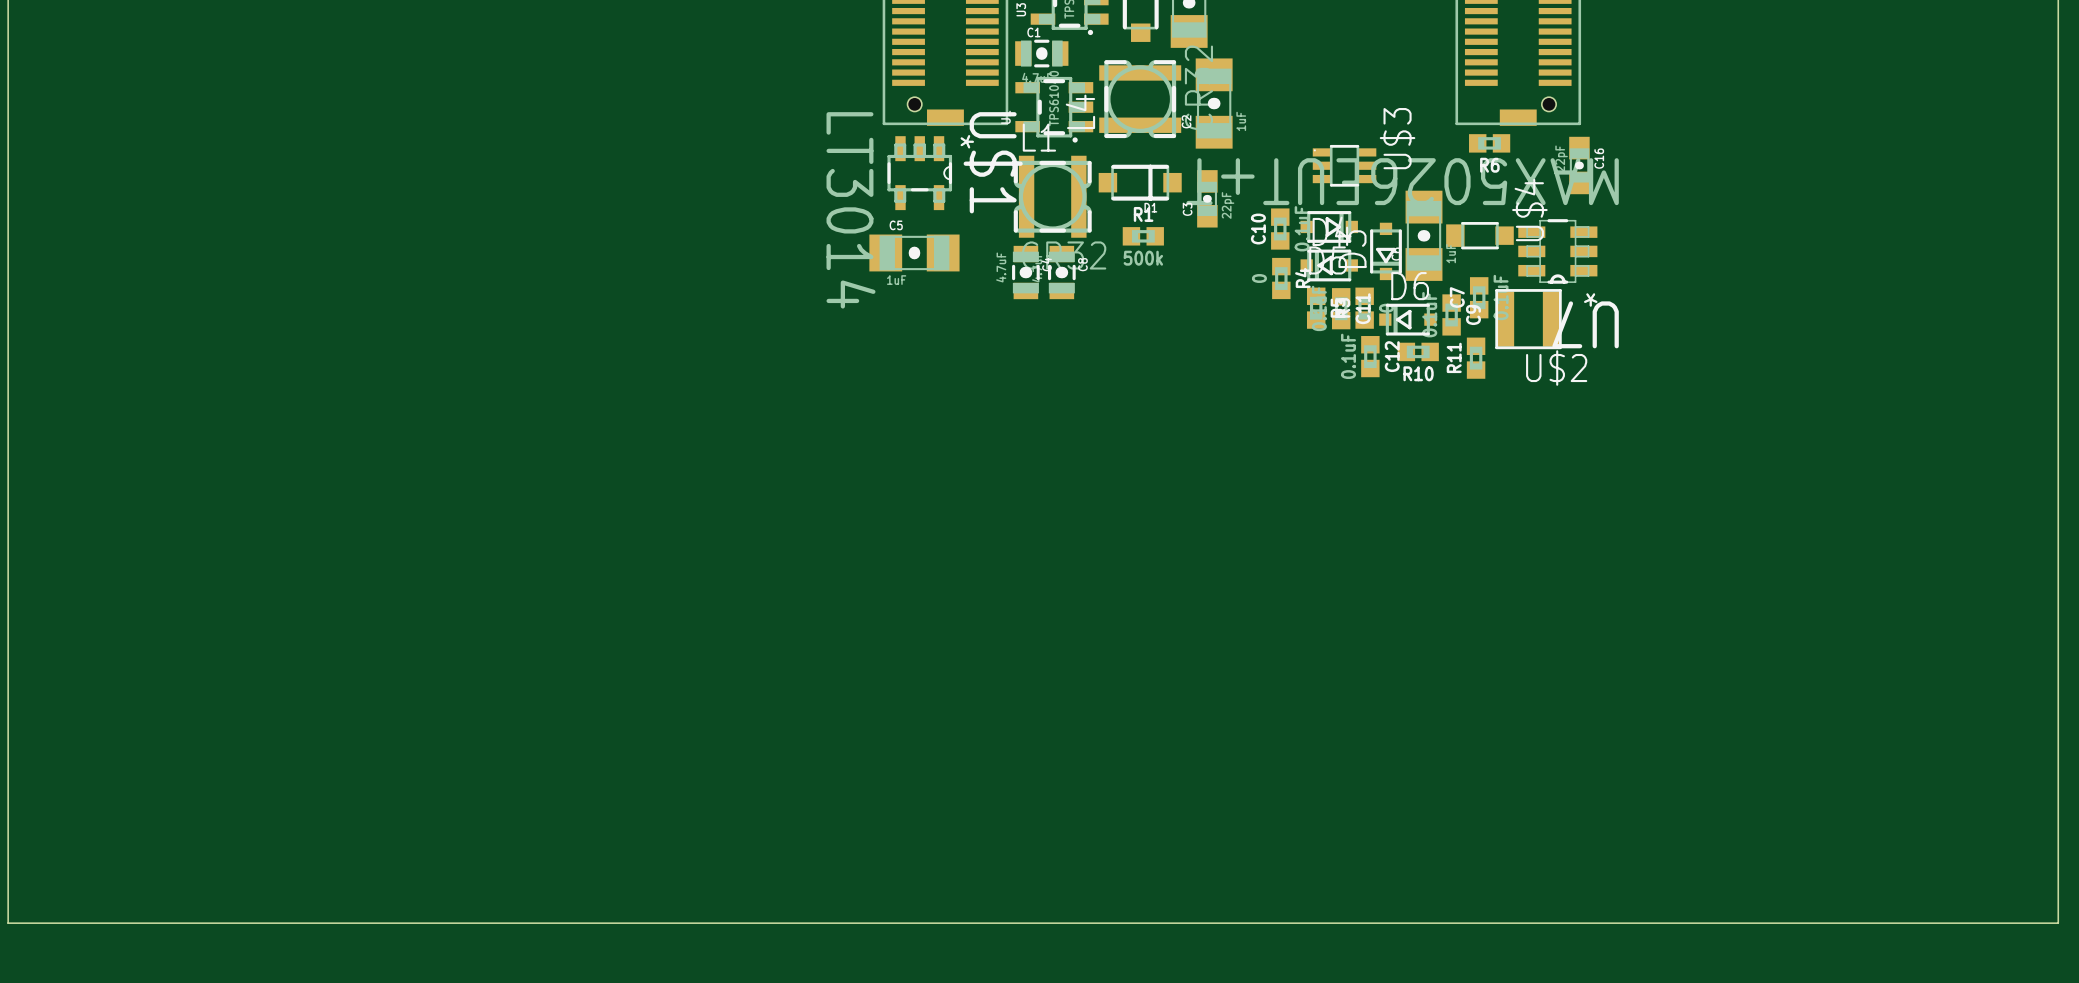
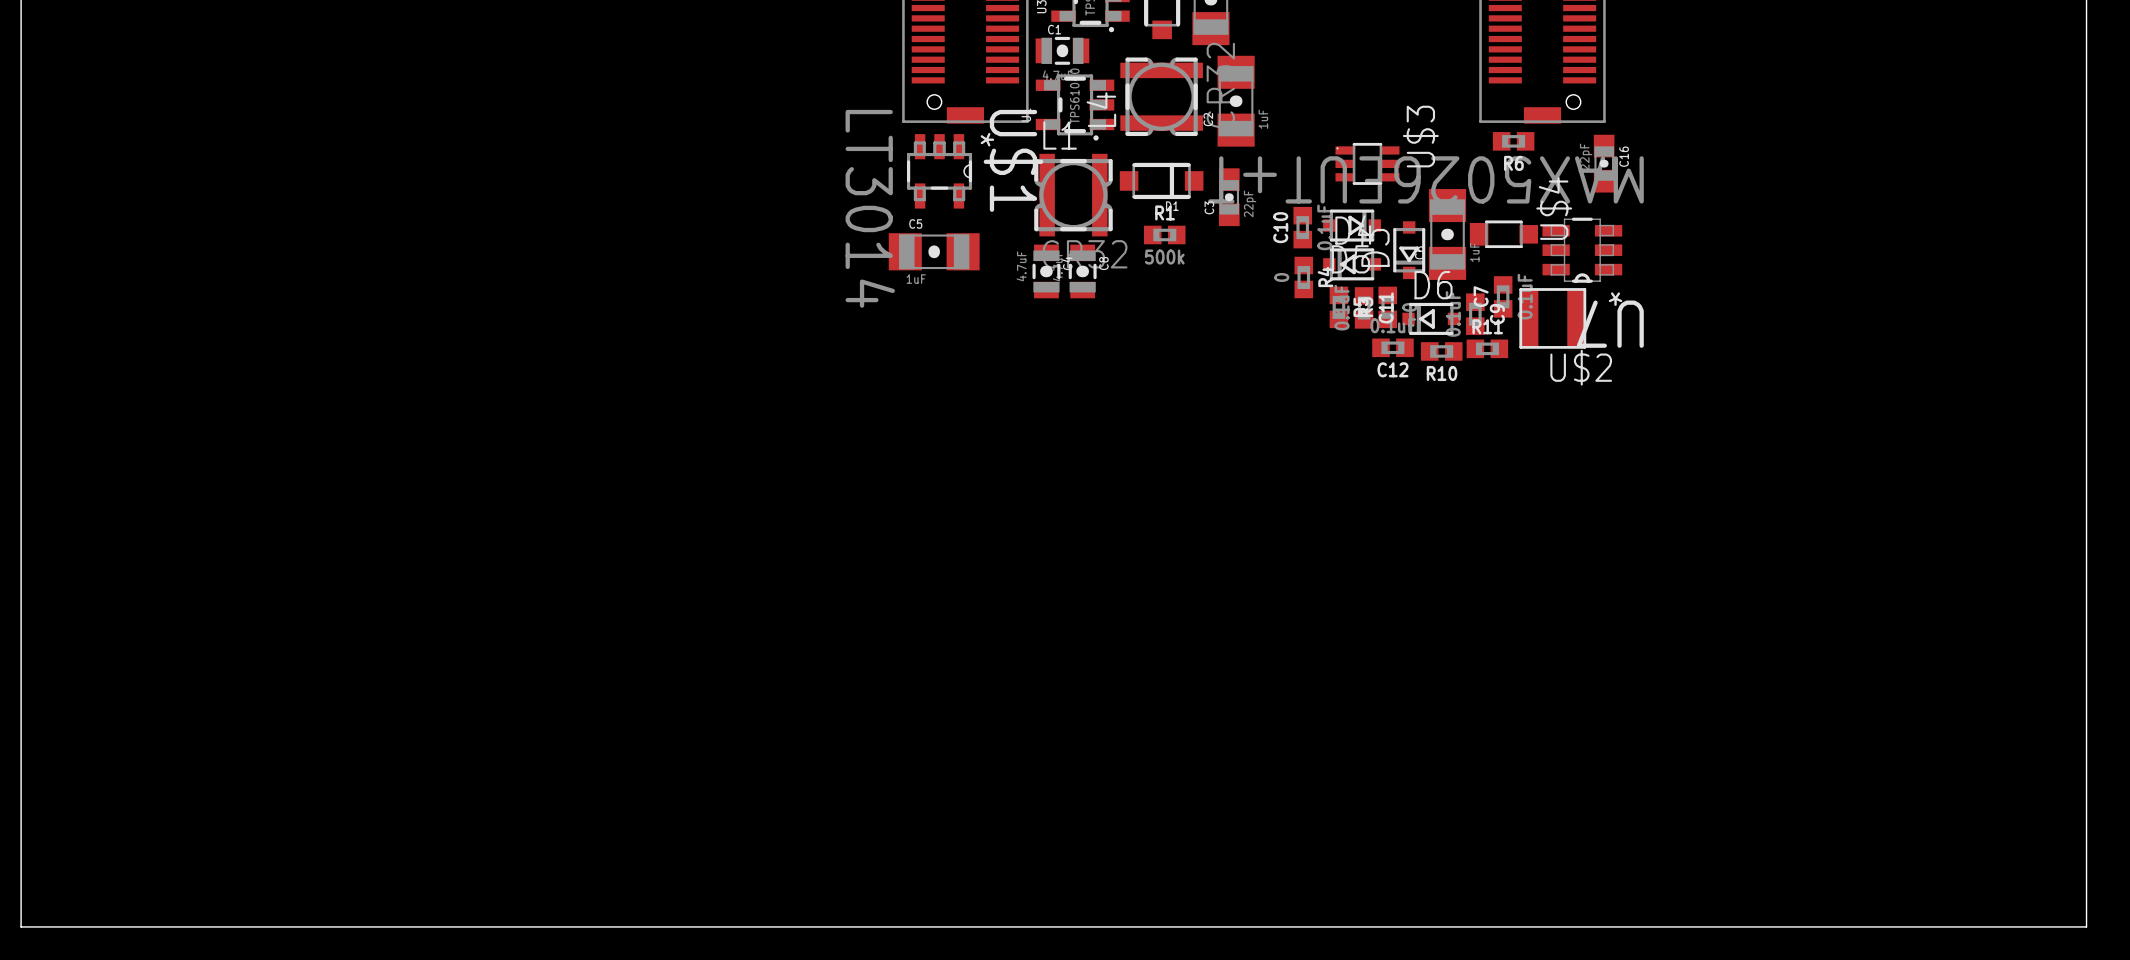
C12 rotation: 0° (1370, 356) -> 90° clockwise (1392, 347)
R11 rotation: 0° (1476, 358) -> 90° clockwise (1487, 348)

